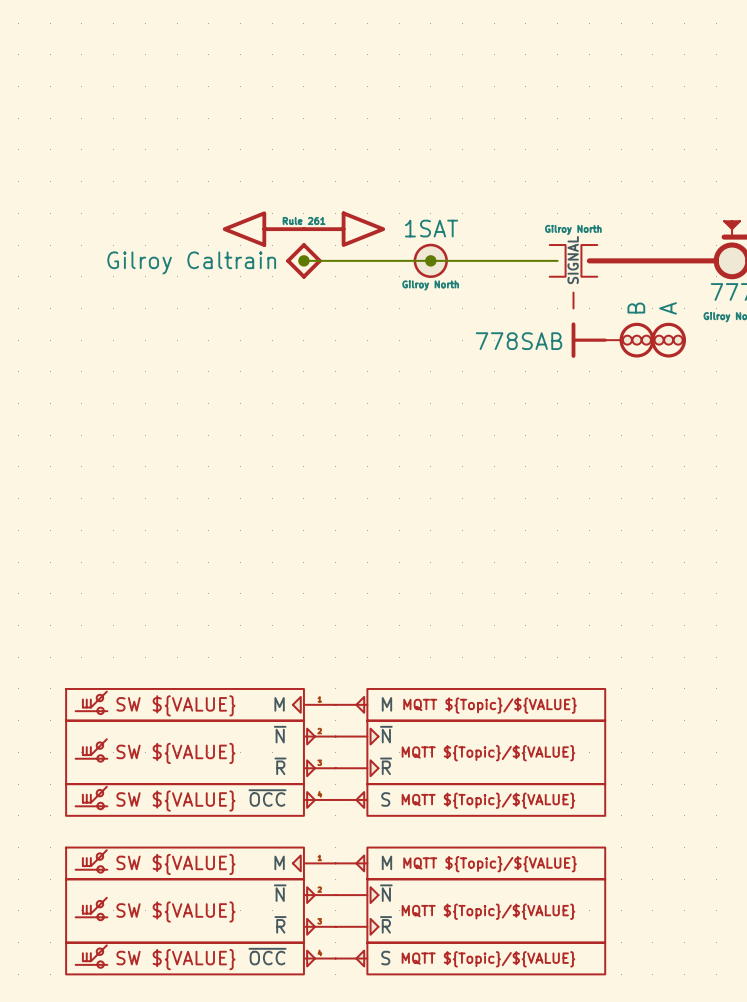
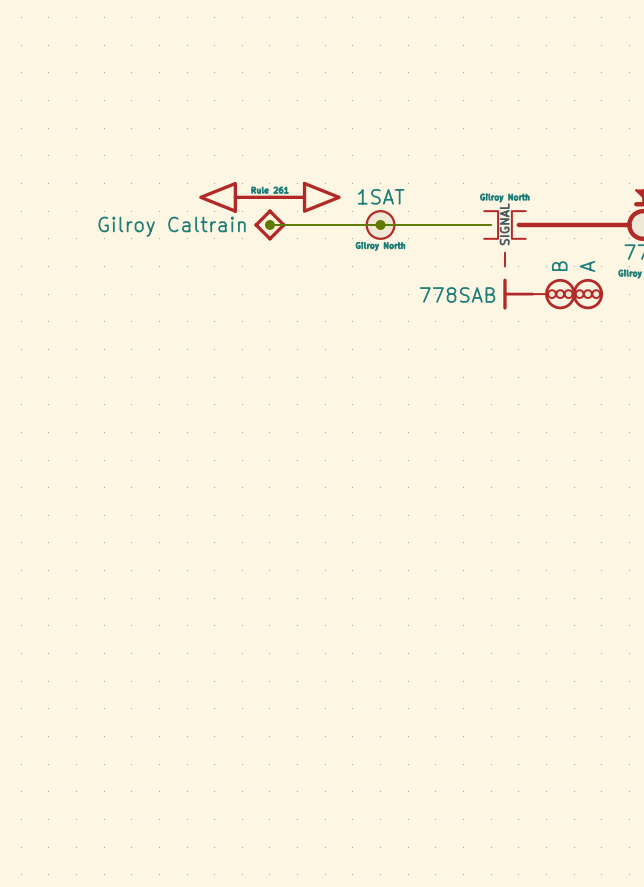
part: (200, 704) -> none
part: (470, 704) -> none
part: (200, 752) -> none
part: (470, 752) -> none
part: (200, 799) -> none
part: (470, 799) -> none
part: (200, 863) -> none
part: (470, 863) -> none
part: (200, 910) -> none
part: (470, 910) -> none
part: (200, 958) -> none
part: (470, 958) -> none

